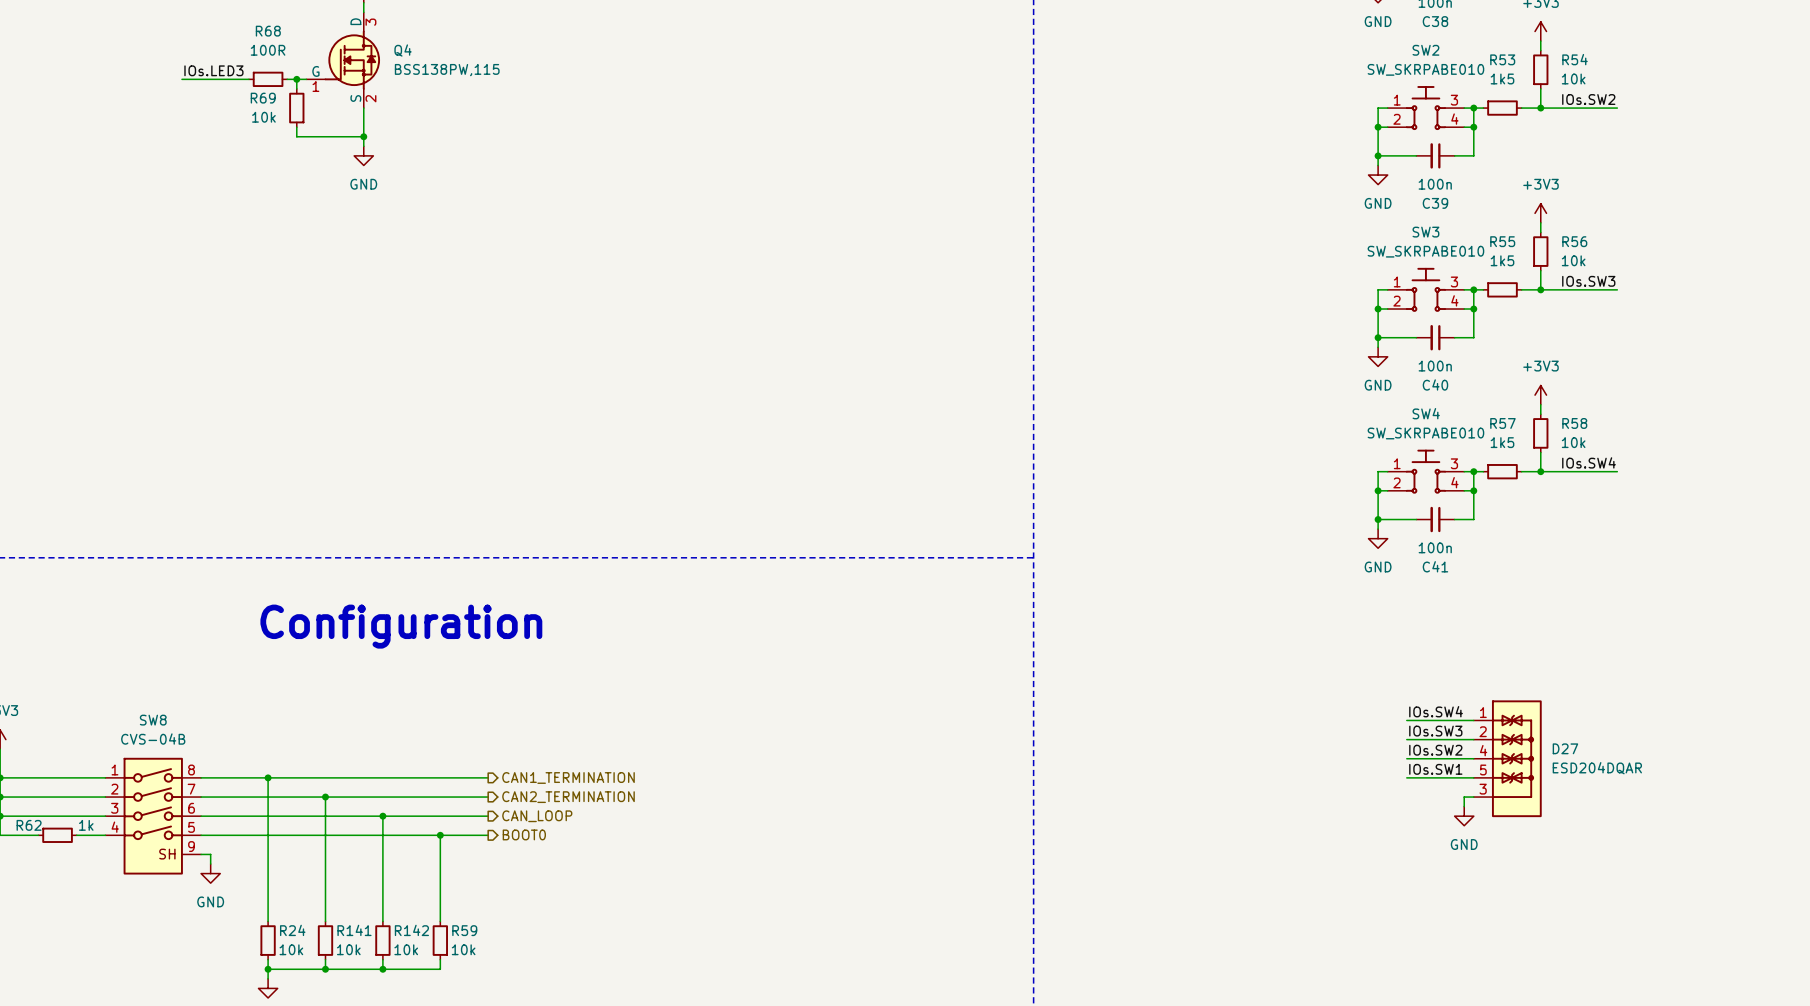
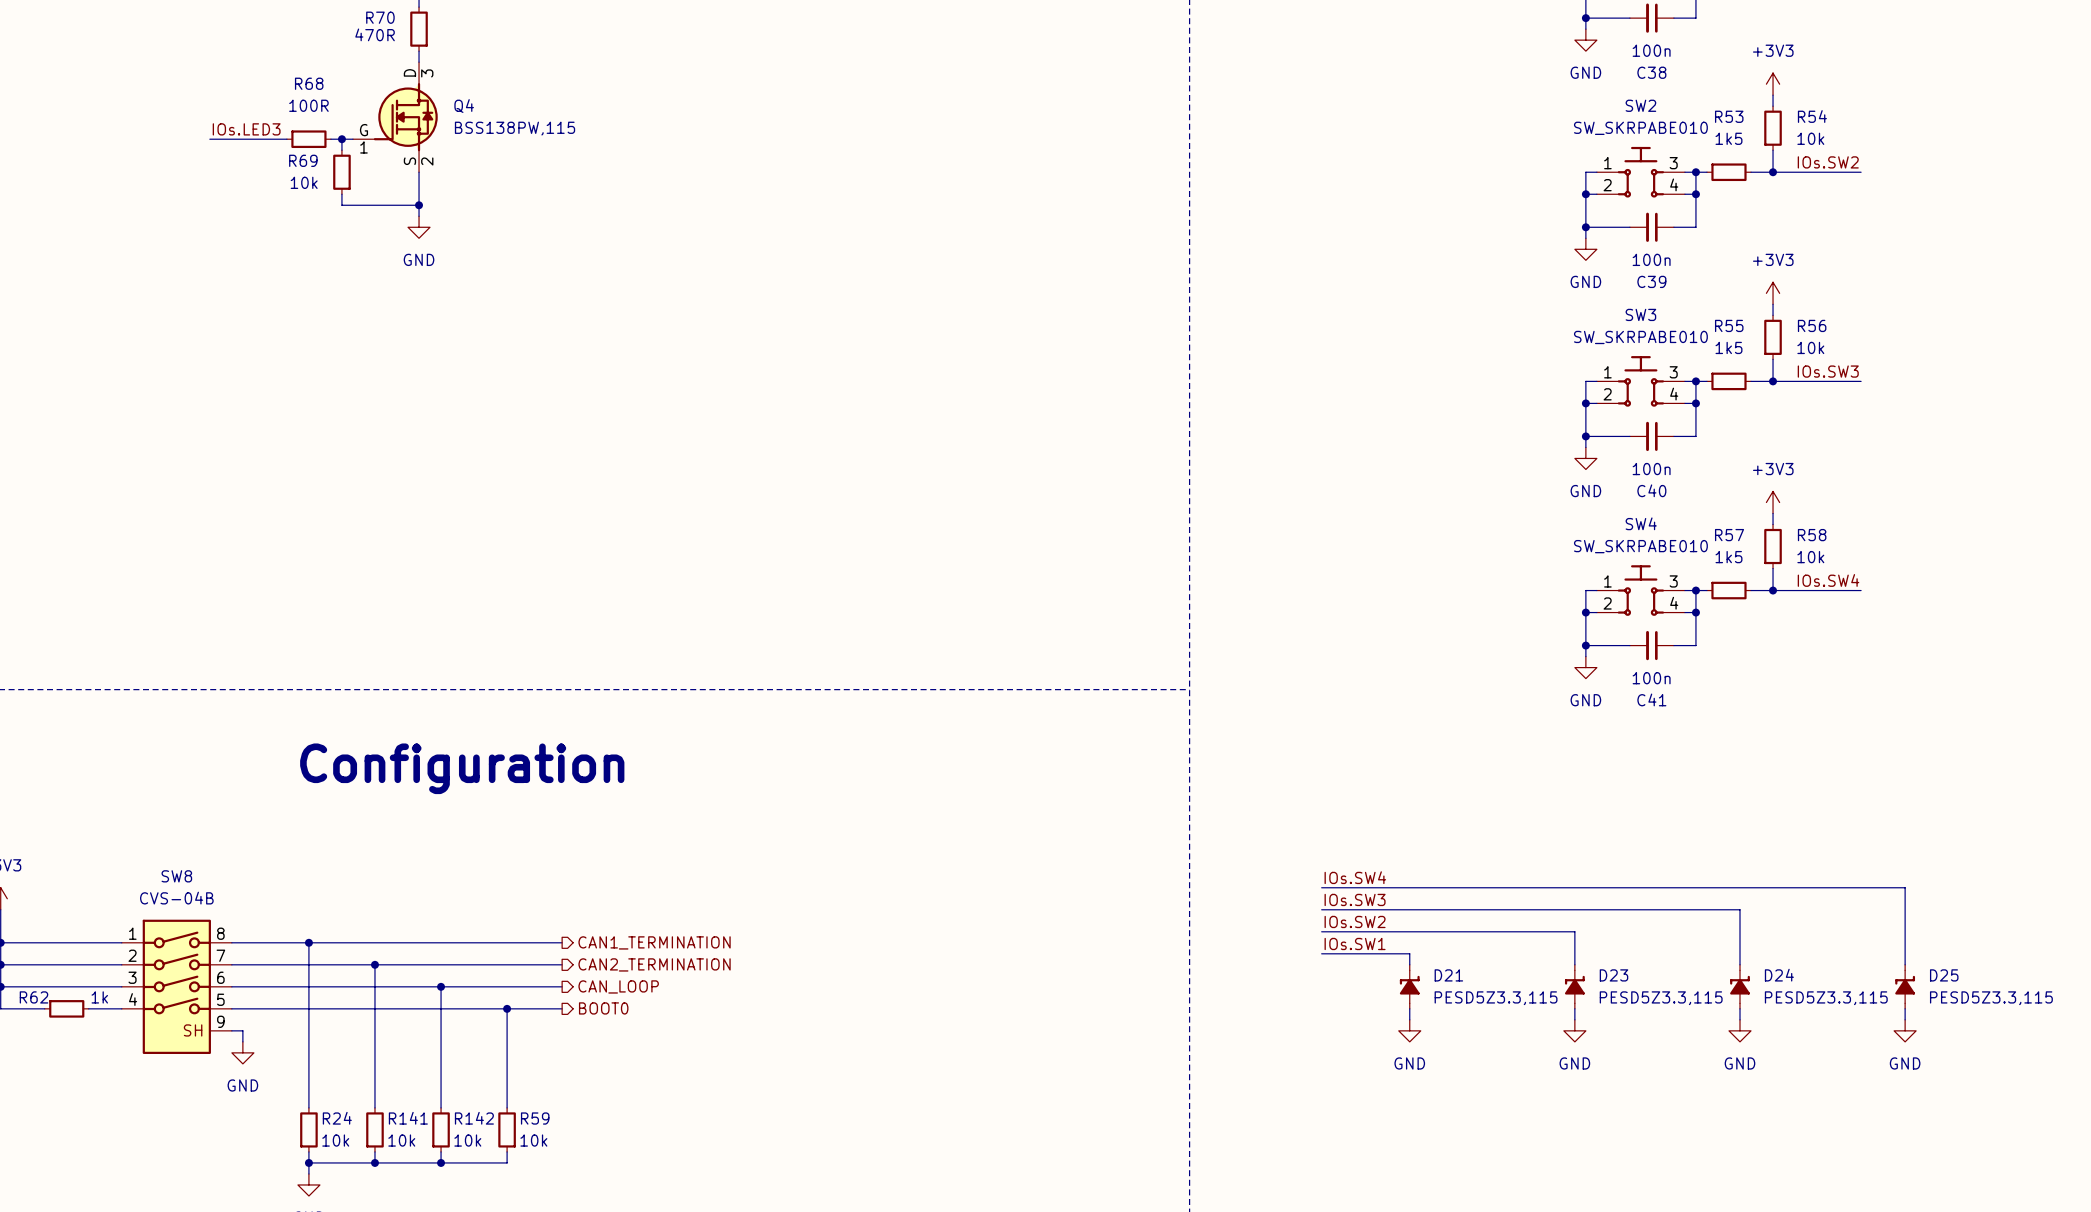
label: IOs.SW4 (1436, 711) -> none
wire: (1406, 720) (1473, 720) -> none
label: none -> IOs.SW4 (1355, 877)
wire: none -> (1321, 887) (1905, 887) (1905, 964)
label: IOs.SW3 (1435, 731) -> none
wire: (1406, 739) (1473, 739) -> none
label: none -> IOs.SW3 (1355, 899)
wire: none -> (1321, 909) (1739, 909) (1739, 964)
label: IOs.SW2 (1435, 750) -> none
wire: (1406, 758) (1473, 758) -> none
D27: (1507, 758) -> none
label: none -> IOs.SW2 (1355, 921)
wire: none -> (1321, 931) (1574, 931) (1574, 964)
label: IOs.SW1 (1435, 769) -> none
wire: (1406, 777) (1473, 777) -> none
label: none -> IOs.SW1 (1355, 943)
wire: none -> (1321, 953) (1409, 953) (1409, 964)
wire: (1473, 797) (1464, 797) (1464, 806) -> none
D21: none -> (1409, 986)
D23: none -> (1574, 986)
power symbol: GND (1464, 816) -> none
D24: none -> (1739, 986)
D25: none -> (1905, 986)
wire: none -> (1409, 1008) (1409, 1019)
wire: none -> (1574, 1008) (1574, 1019)
wire: none -> (1739, 1008) (1739, 1019)
wire: none -> (1905, 1008) (1905, 1019)
power symbol: none -> GND (1409, 1030)
power symbol: none -> GND (1574, 1030)
power symbol: none -> GND (1739, 1030)
power symbol: none -> GND (1905, 1030)

